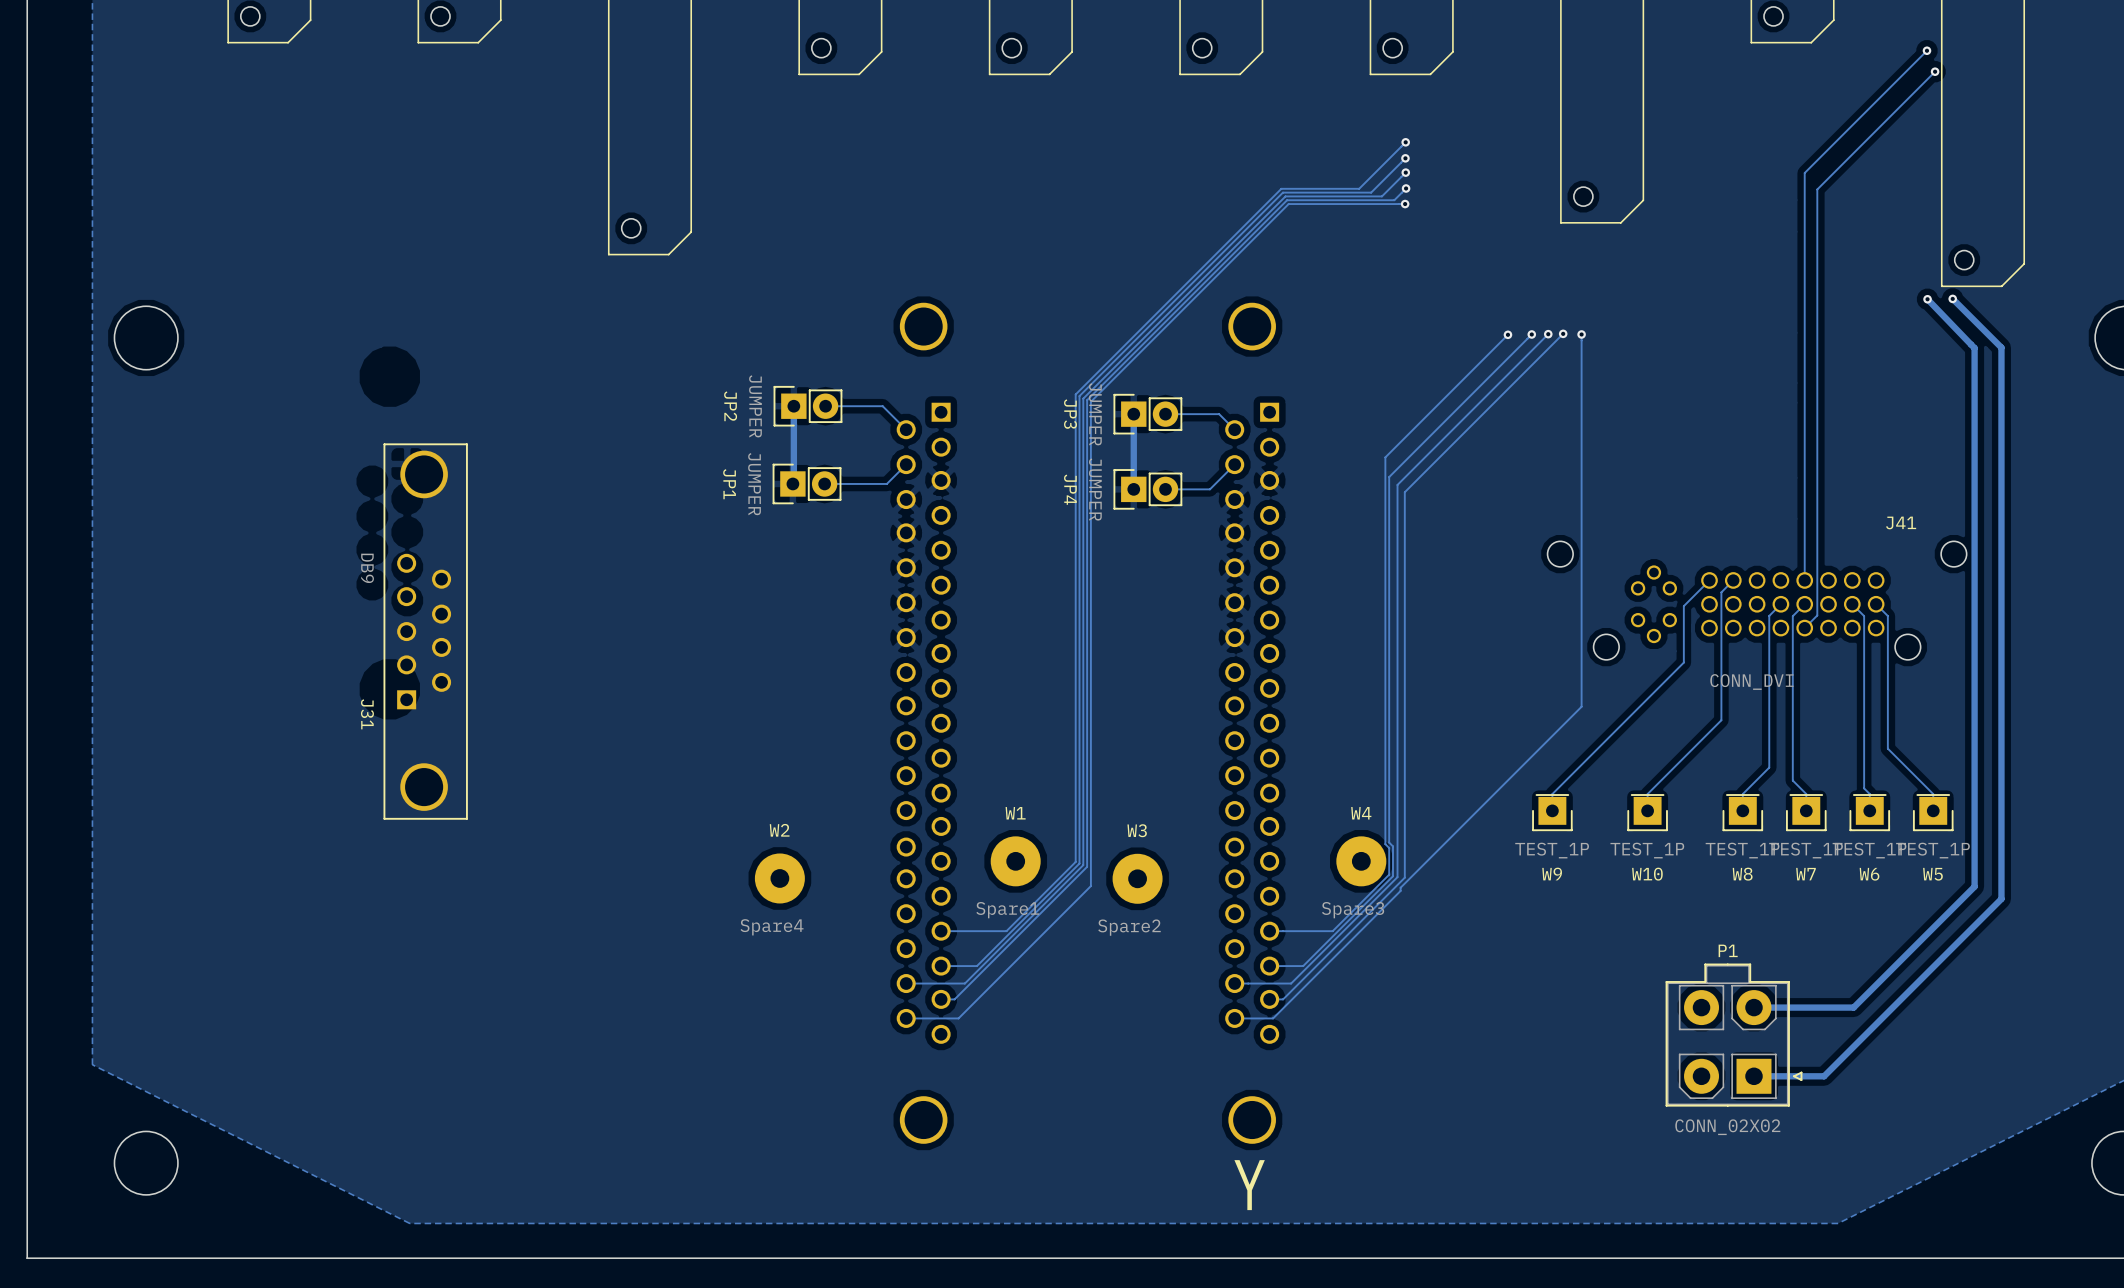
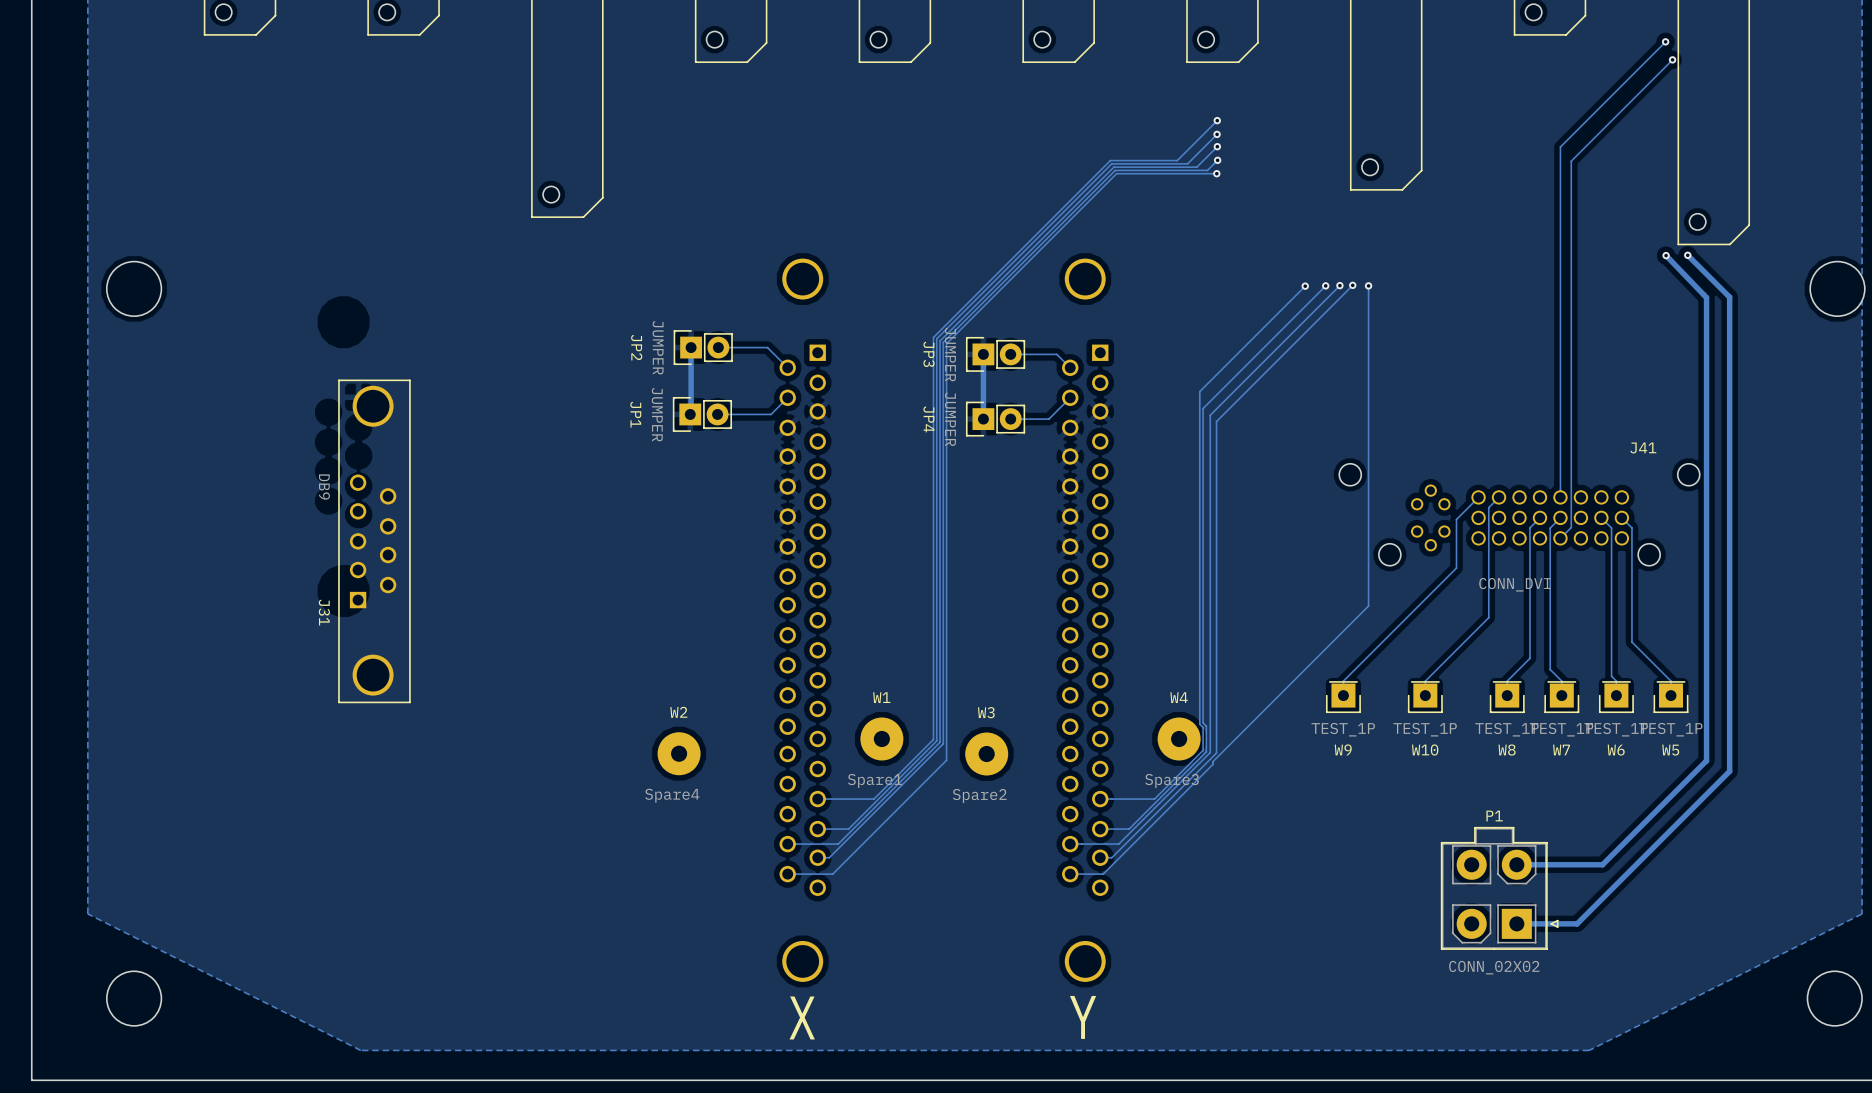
text: none -> X (802, 1017)

